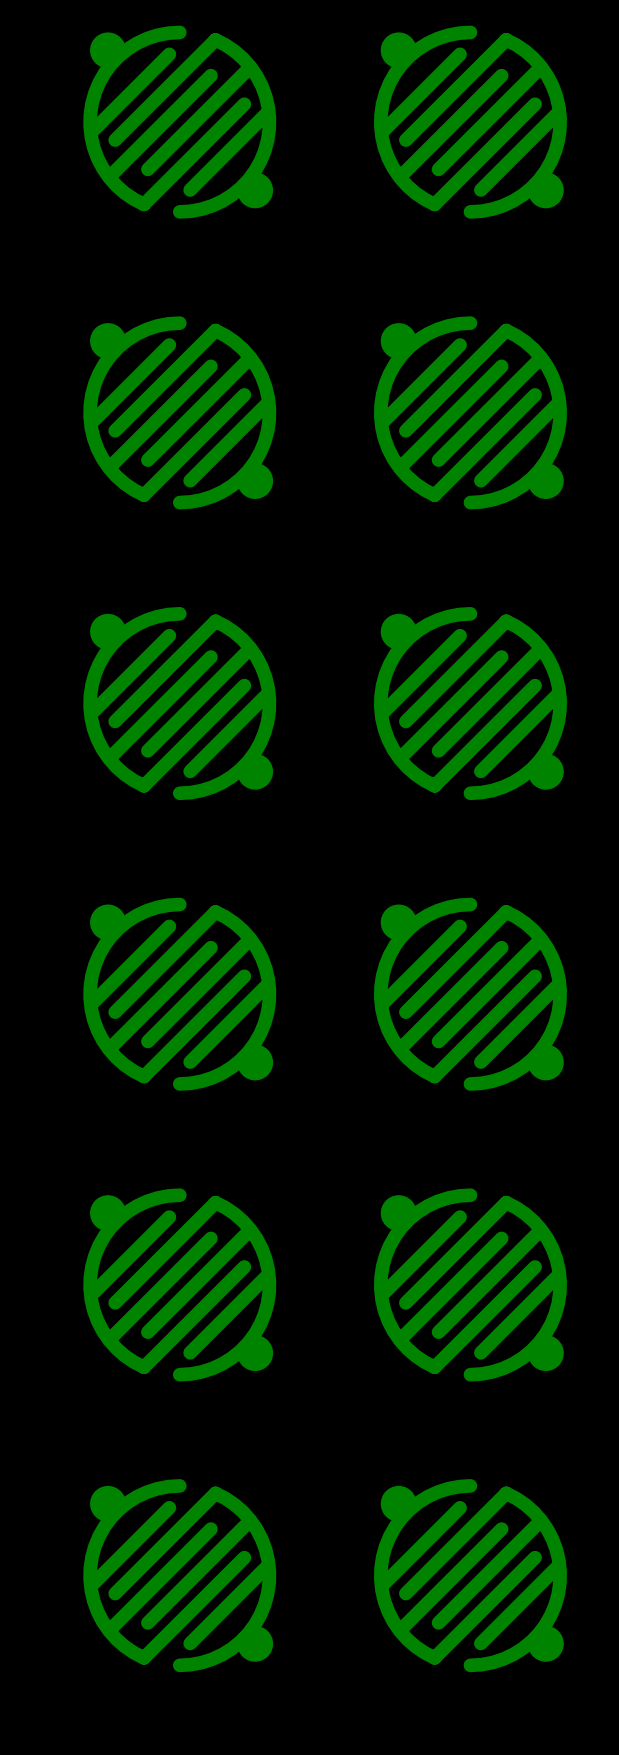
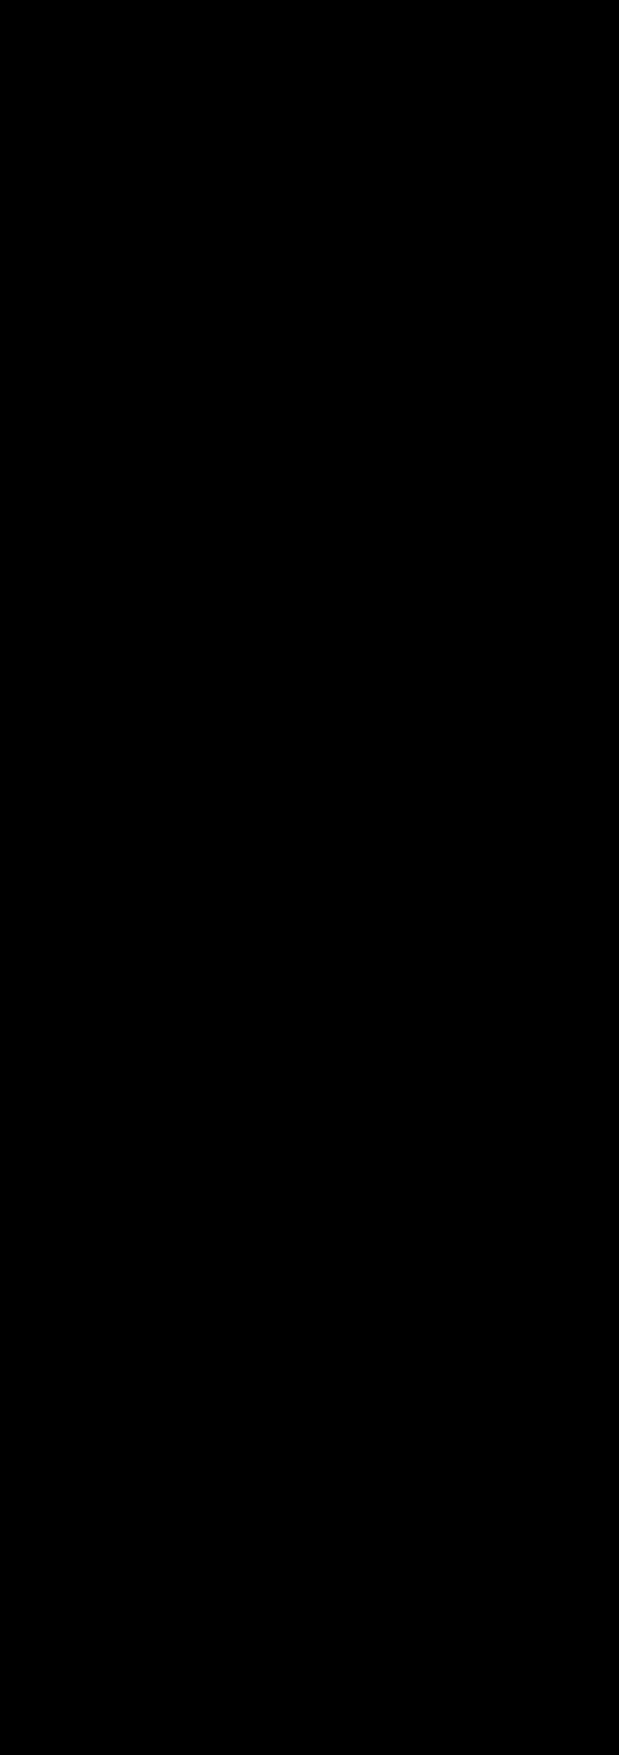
part: (179, 122) -> none
part: (470, 122) -> none
part: (179, 412) -> none
part: (470, 412) -> none
part: (179, 703) -> none
part: (470, 703) -> none
part: (179, 994) -> none
part: (470, 994) -> none
part: (179, 1284) -> none
part: (470, 1284) -> none
part: (179, 1575) -> none
part: (470, 1575) -> none

